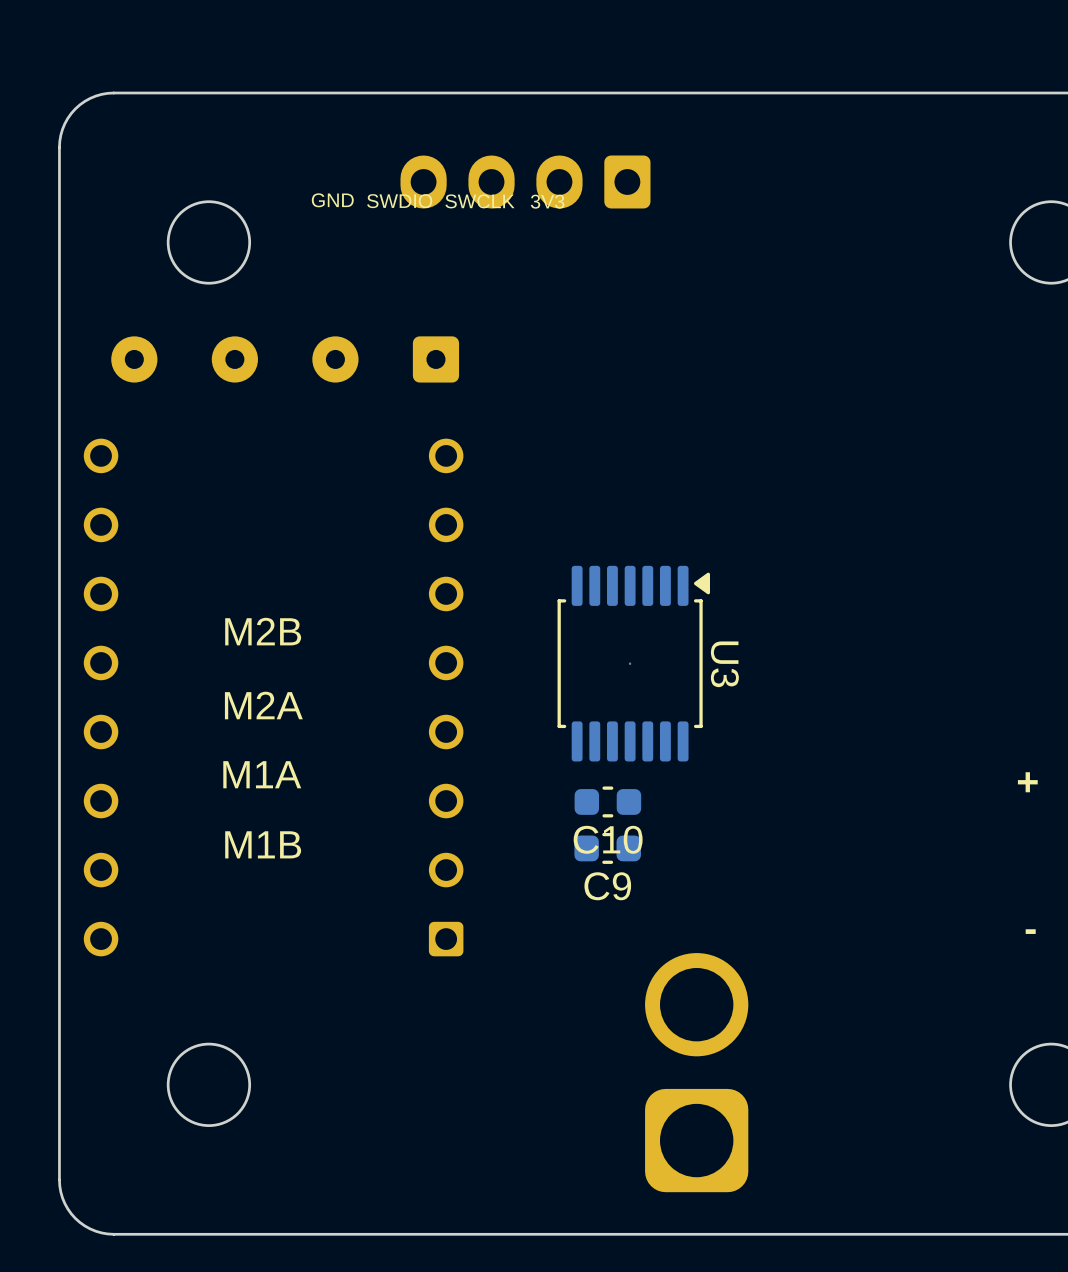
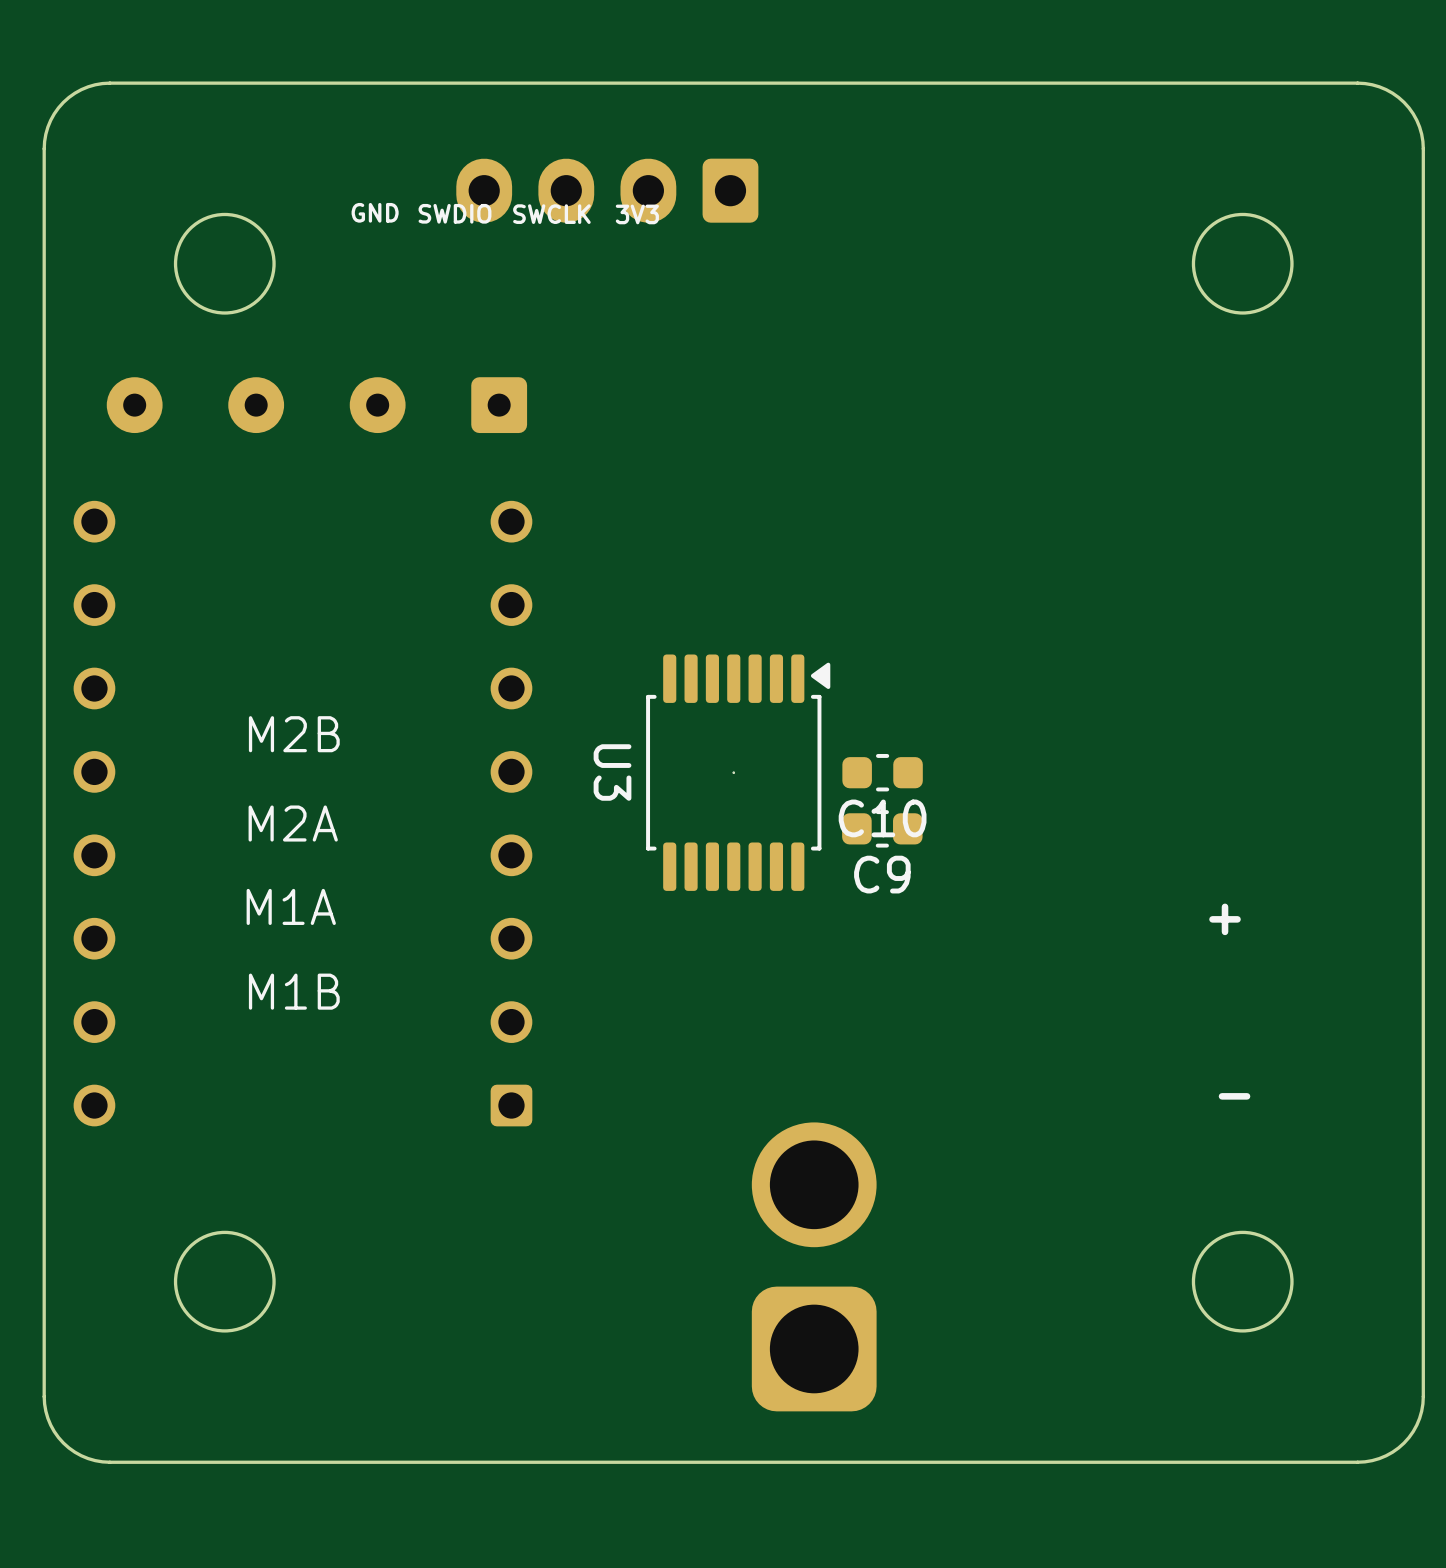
U3 footprint: [557, 565, 711, 762] -> [646, 654, 831, 891]
U3 name position: U3 (724, 664) -> U3 (612, 772)
C10 position: (607, 801) -> (882, 772)
C9 position: (607, 848) -> (882, 828)

